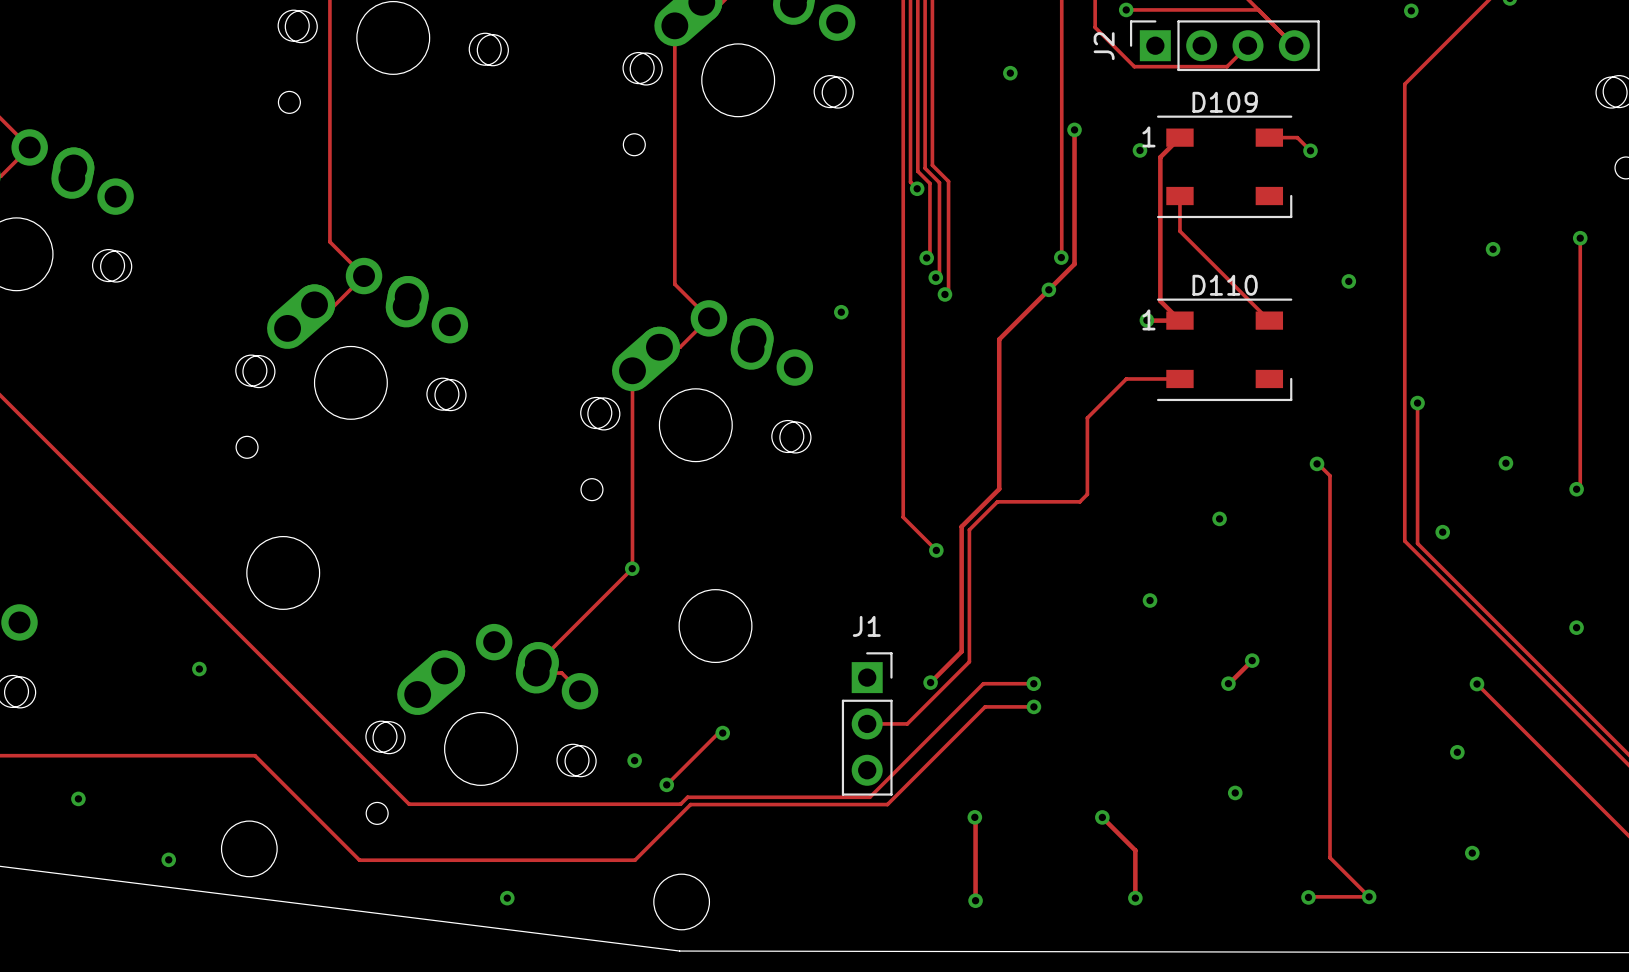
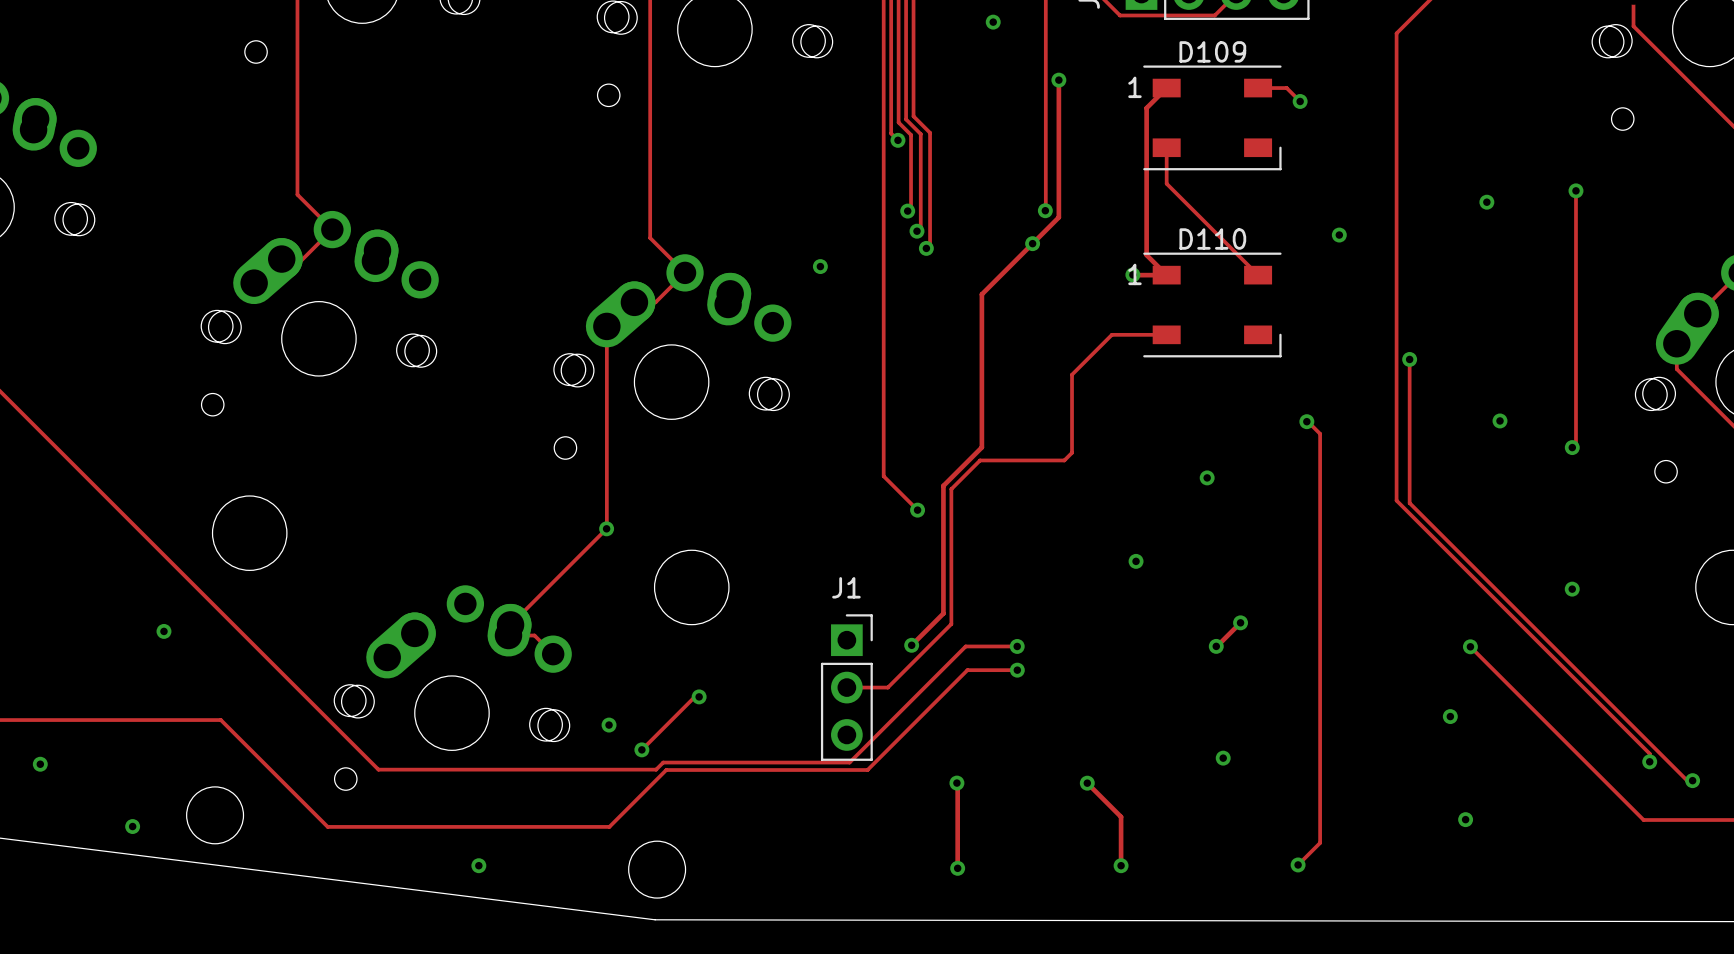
via: (1139, 150) -> none
via: (1442, 532) -> none
track: (1330, 857) (1369, 896) (1309, 896) -> (1320, 824) (1320, 842) (1298, 864)
via: (1369, 896) -> none

